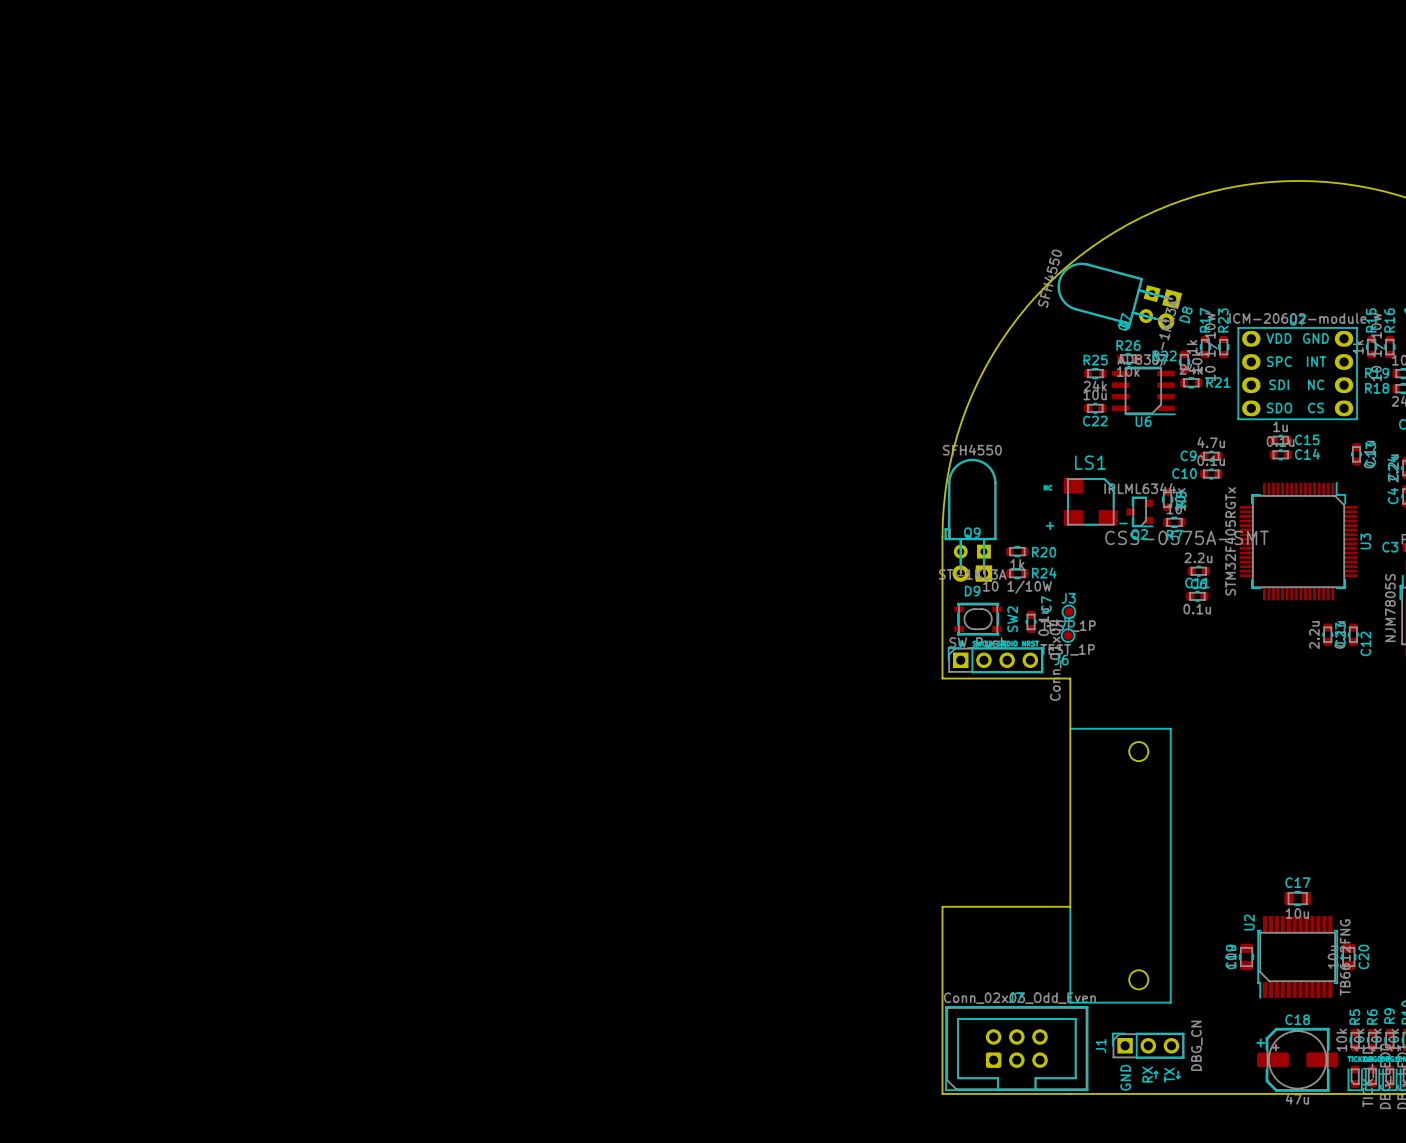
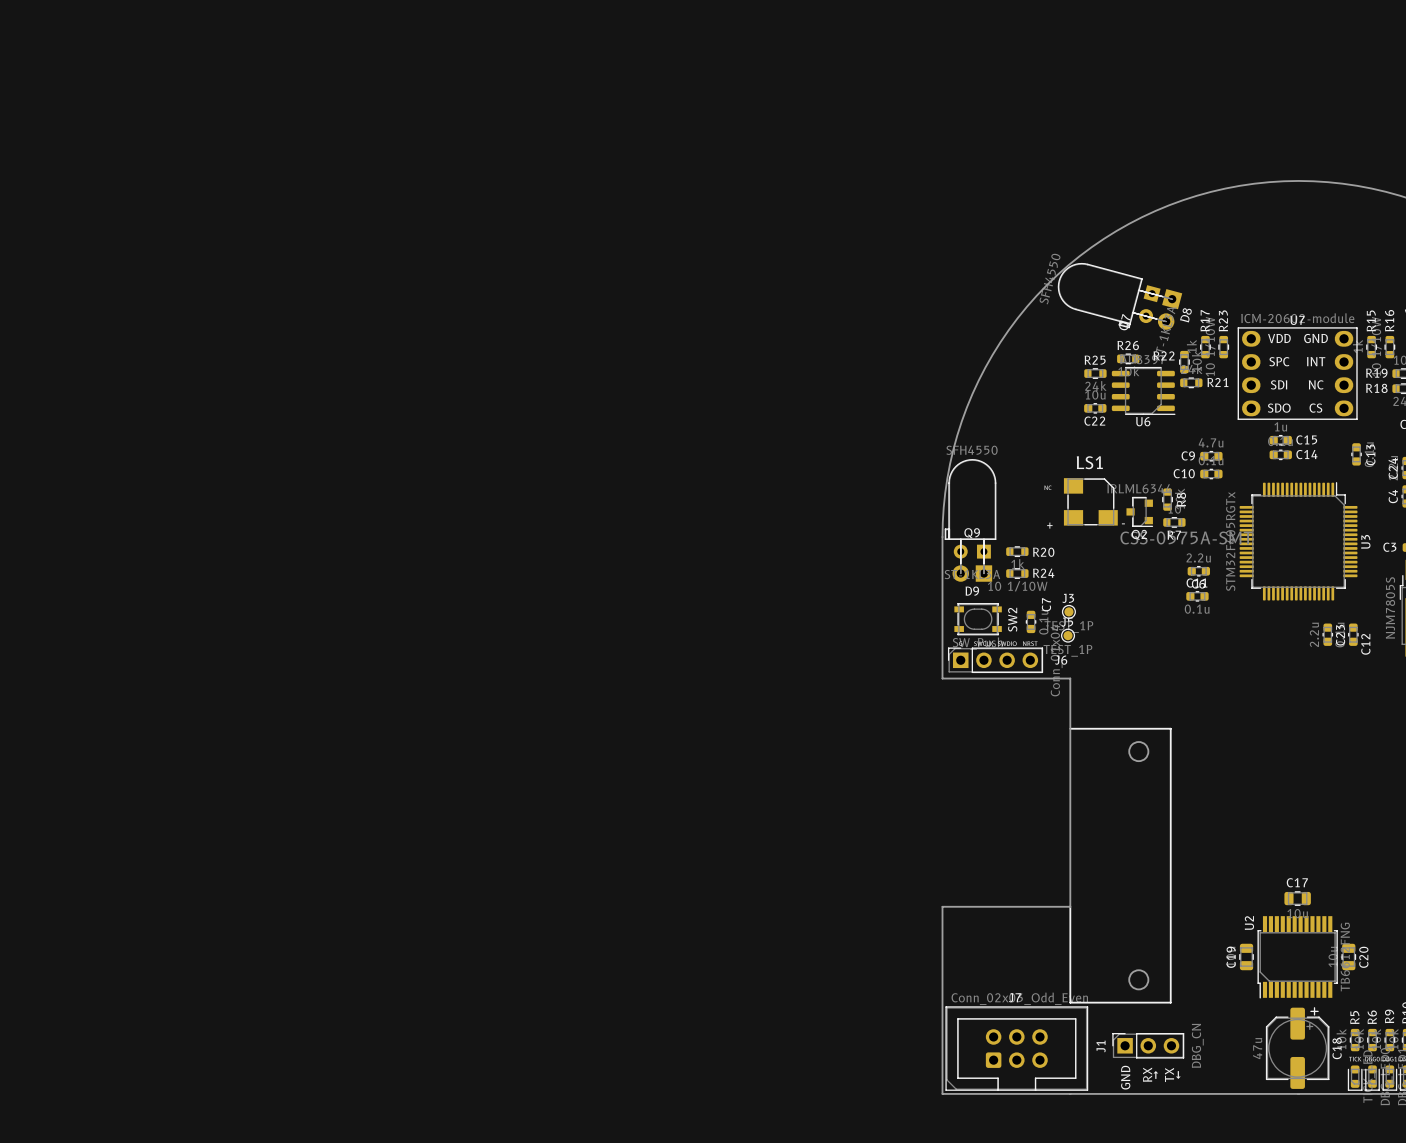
C18 rotation: 0° (1297, 1059) -> 90° clockwise (1297, 1048)

